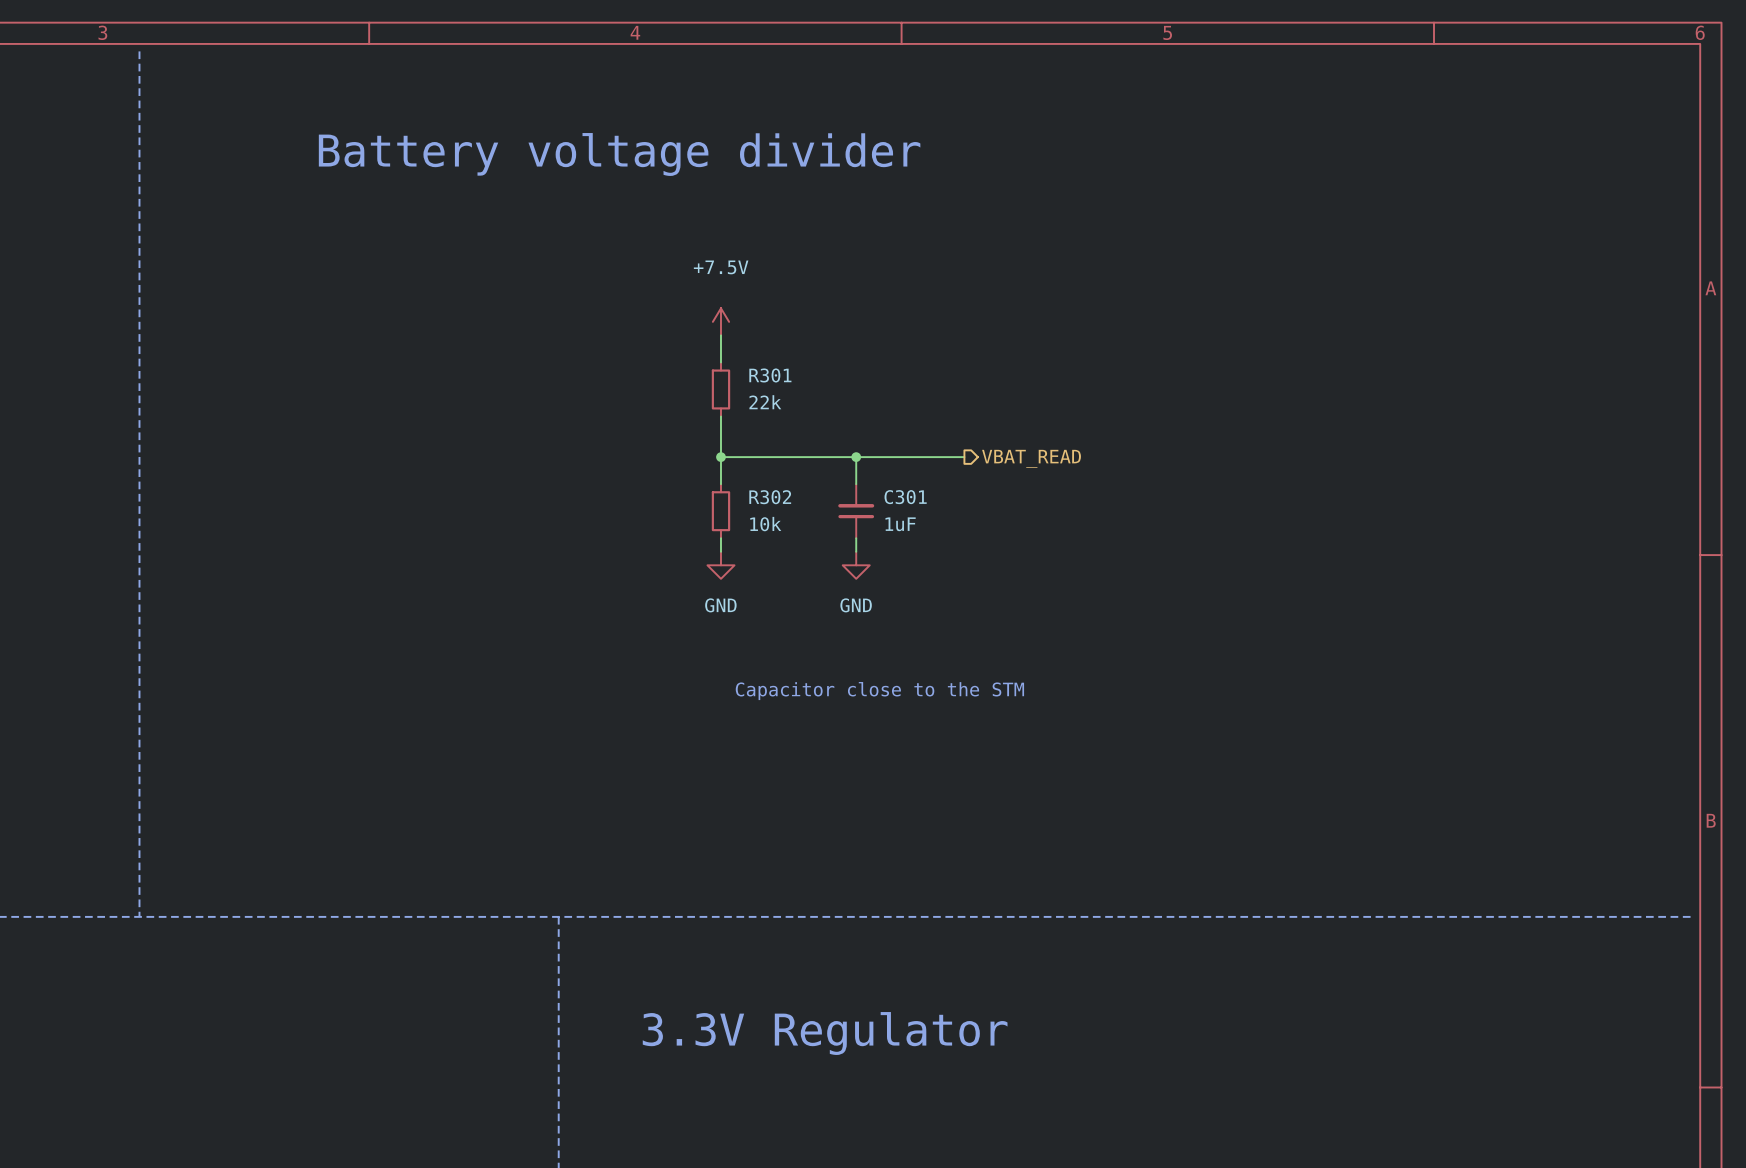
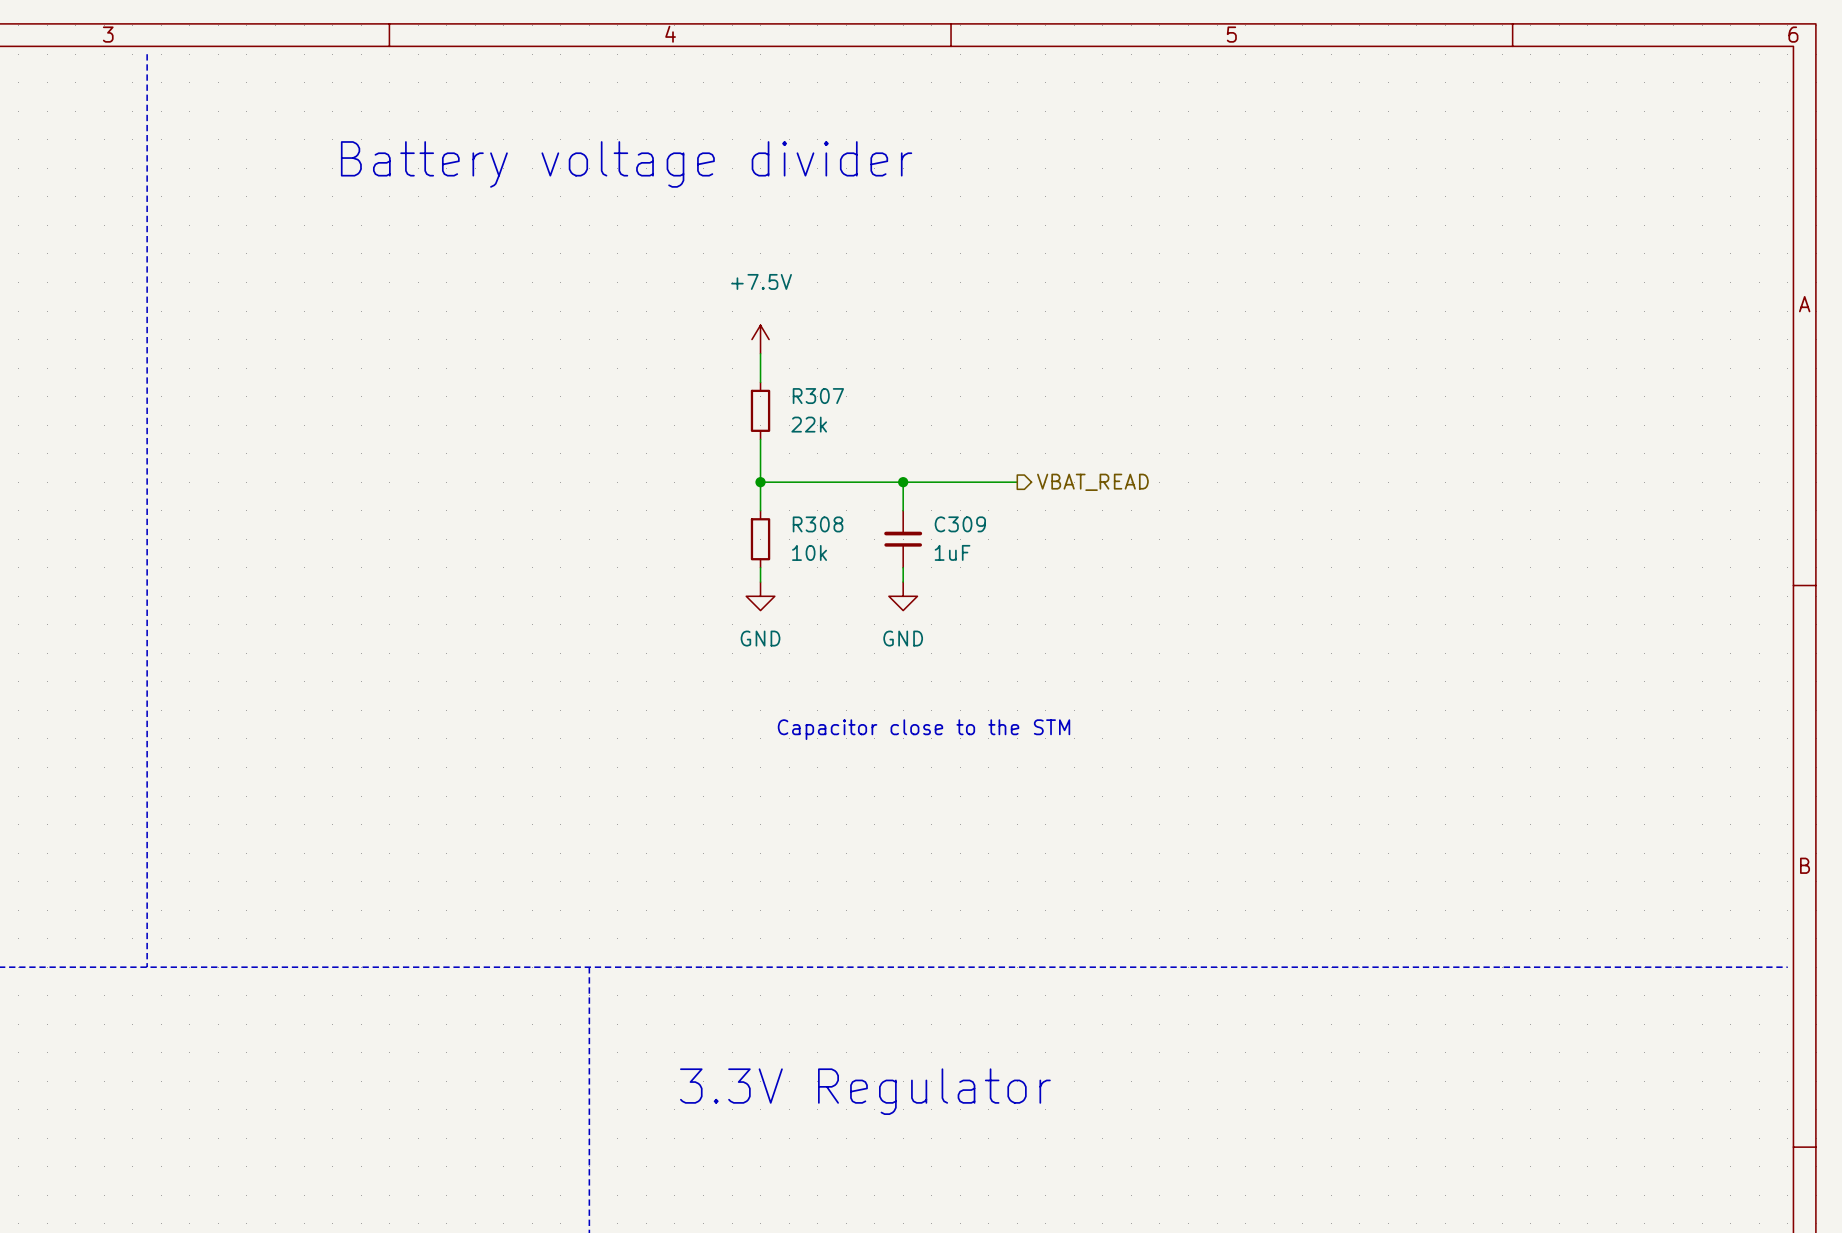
R301 name: R301 (770, 375) -> R307 (818, 396)
R302 name: R302 (770, 497) -> R308 (818, 524)
C301 name: C301 (905, 497) -> C309 (960, 524)

